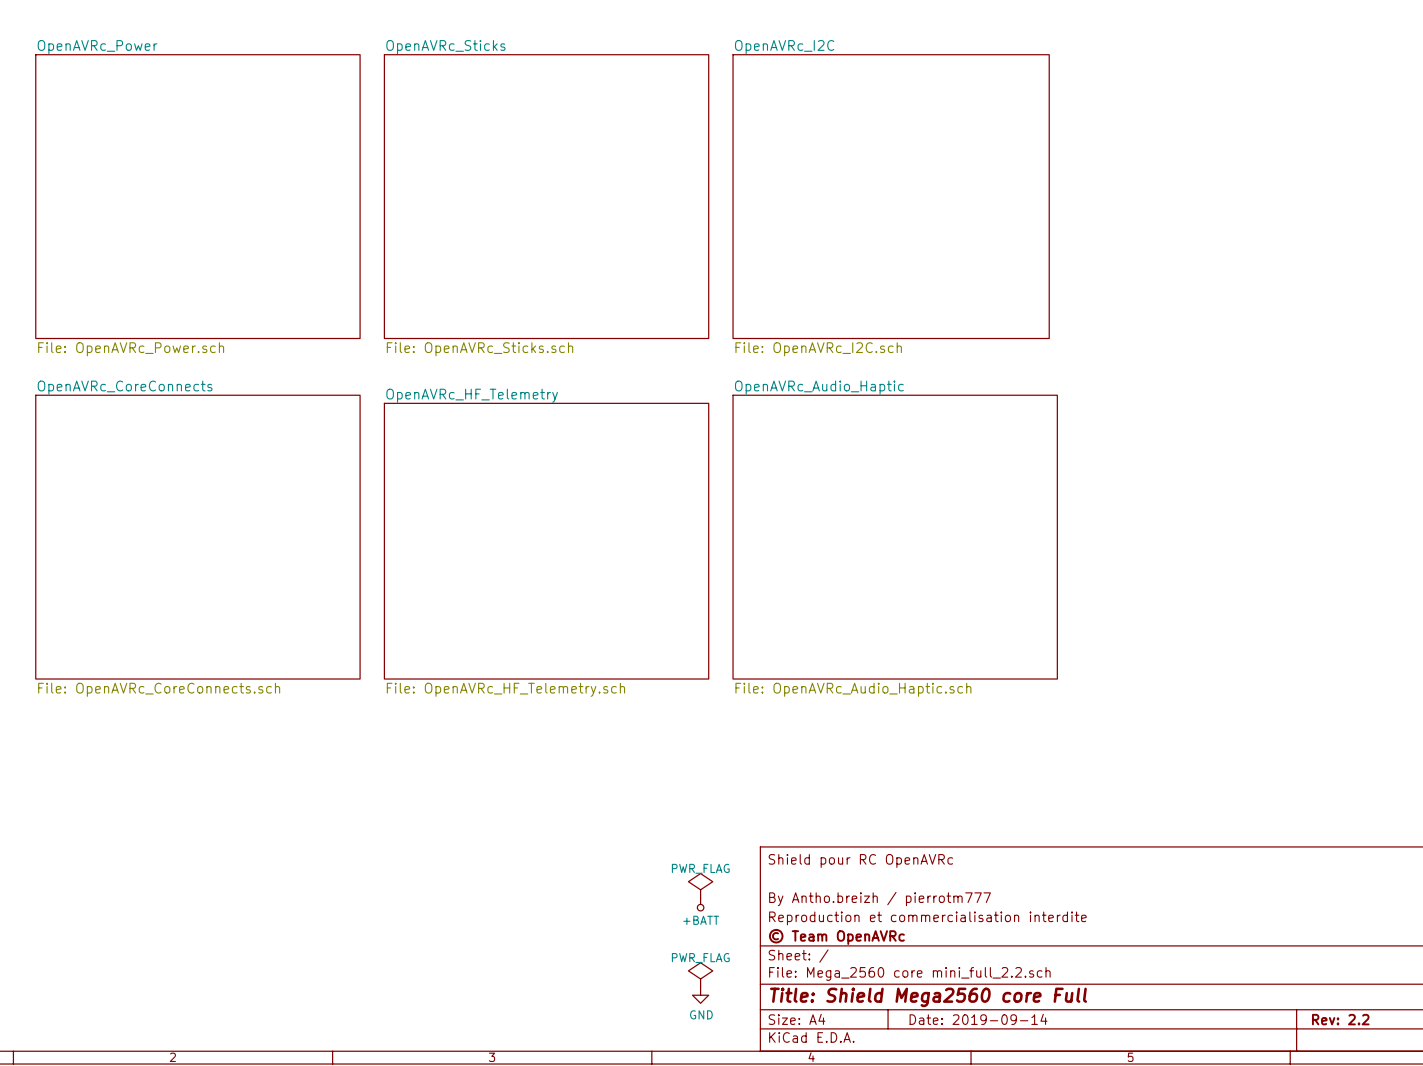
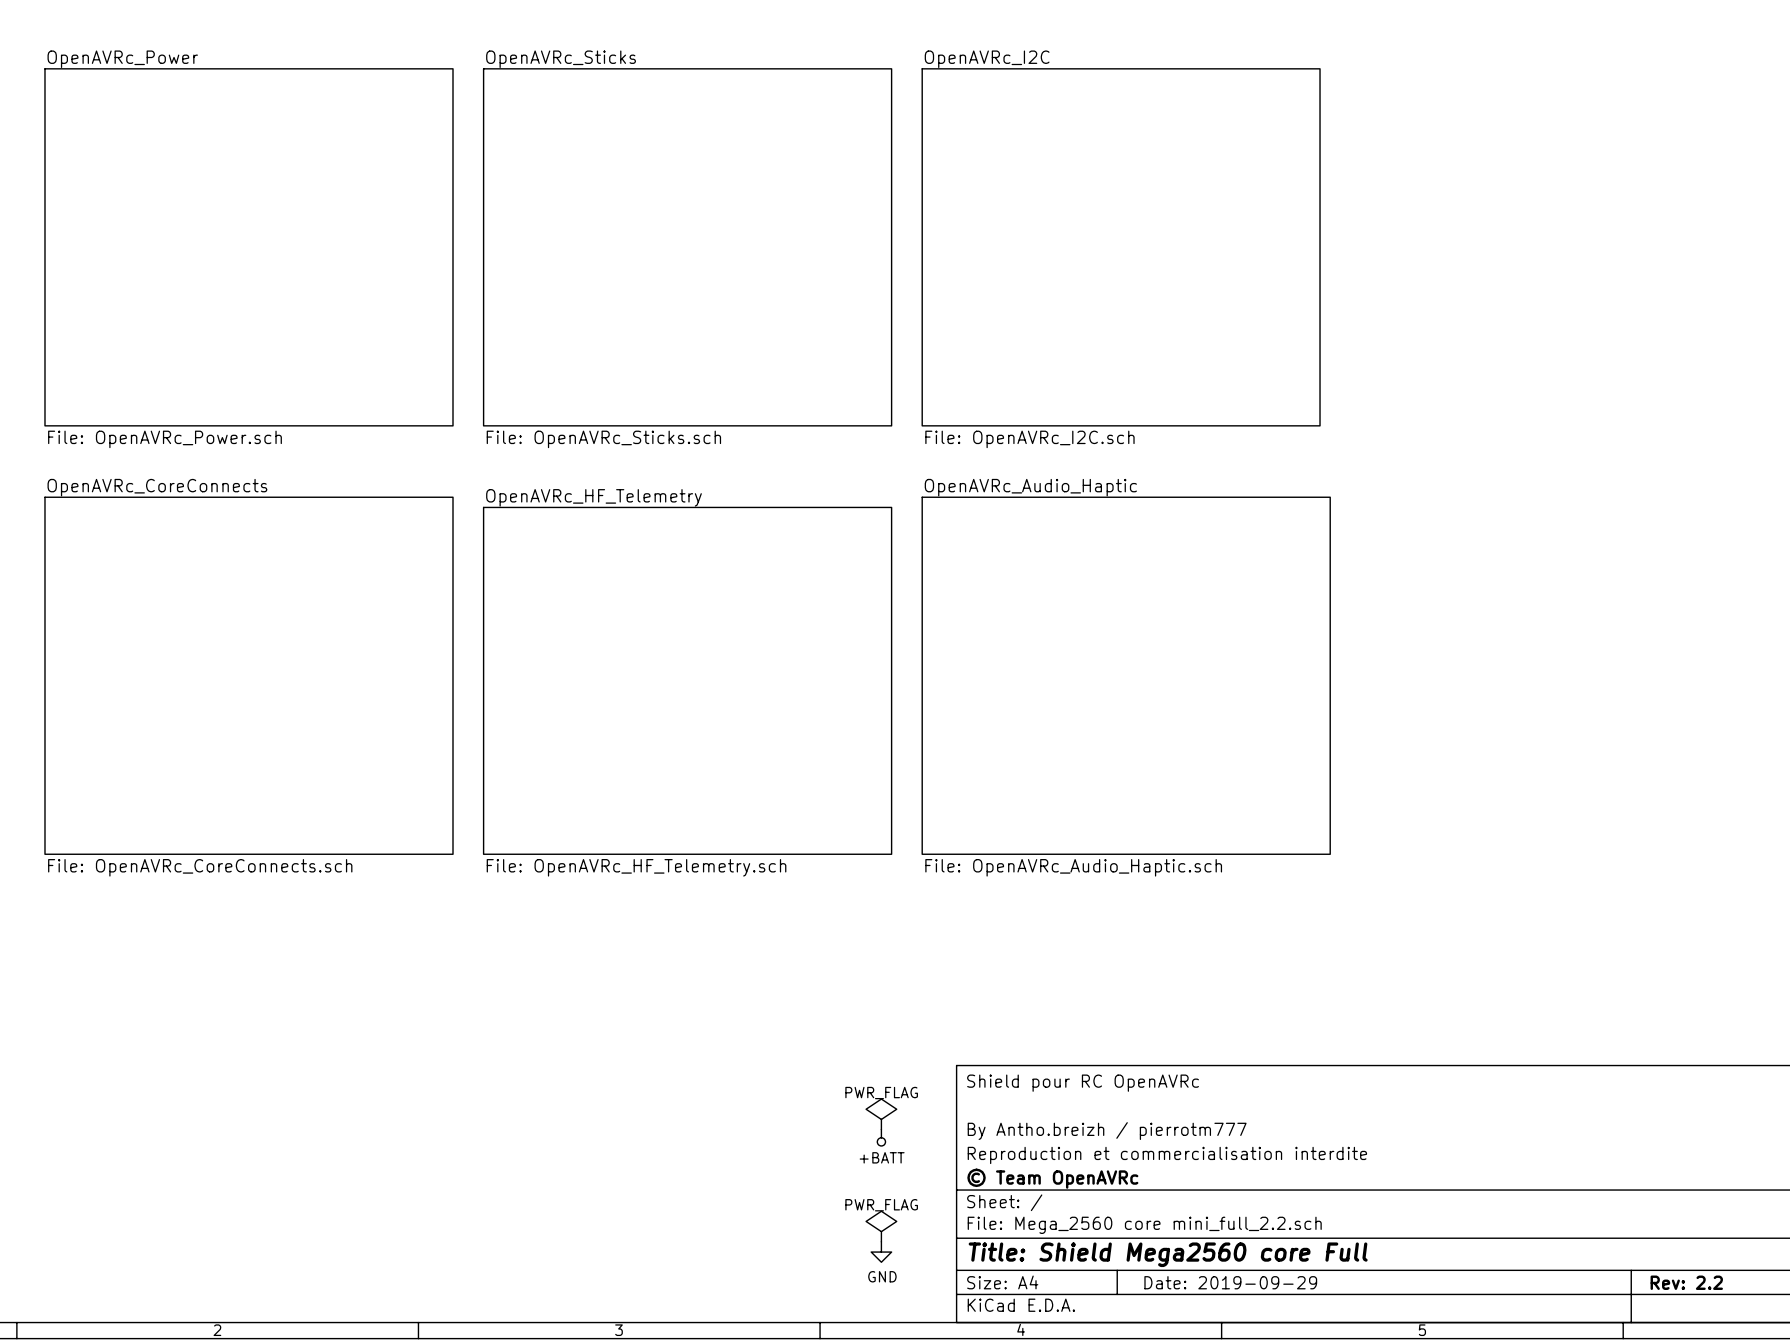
title block: Date: 2019-09-14 (978, 1019) -> Date: 2019-09-29 (1230, 1282)

